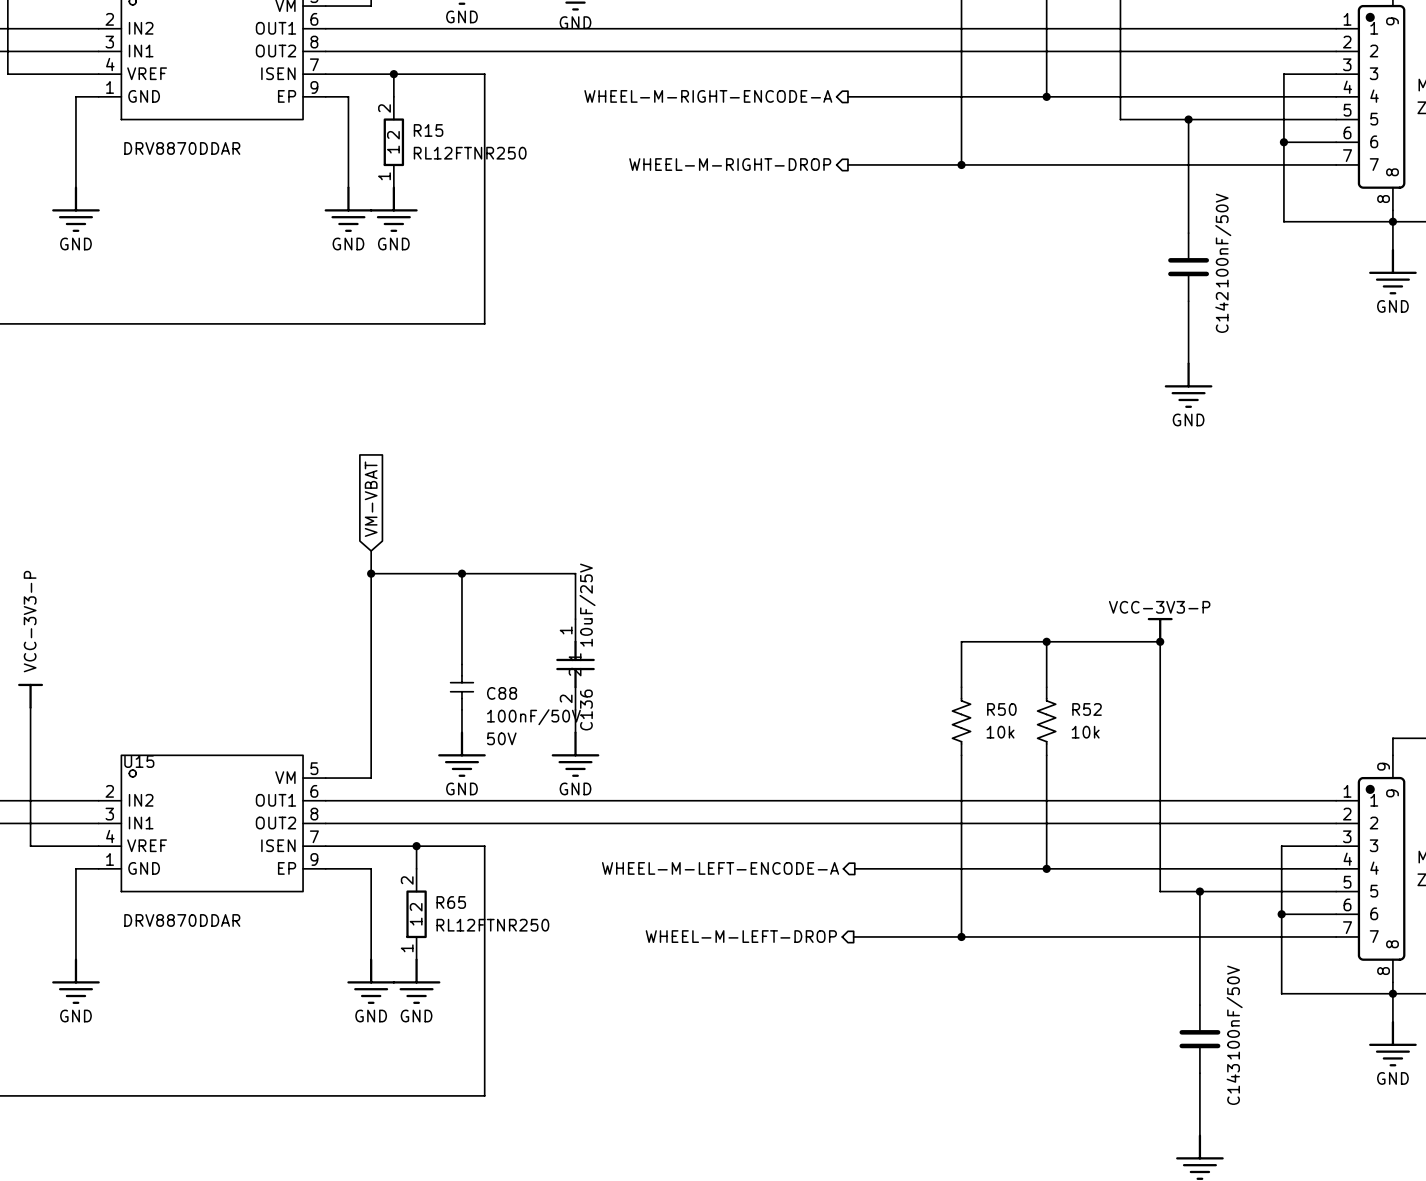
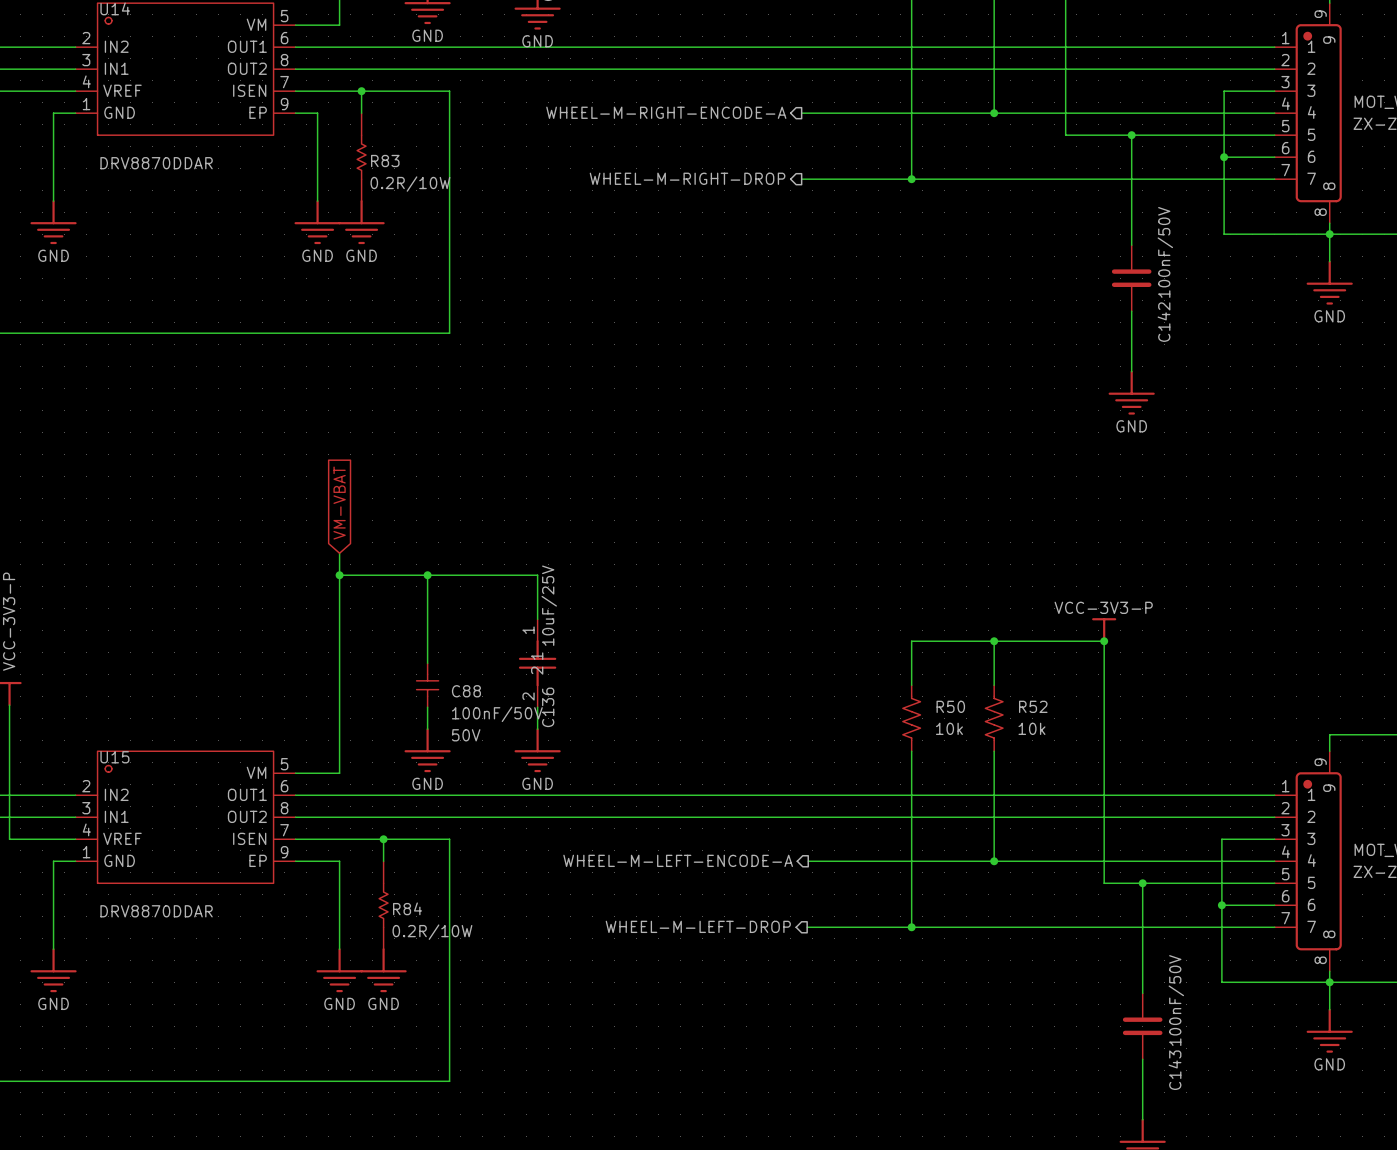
R15: RL12FTNR250 (393, 142) -> none
R83: none -> 0.2R/10W (361, 157)
R65: RL12FTNR250 (416, 914) -> none
R84: none -> 0.2R/10W (383, 905)

